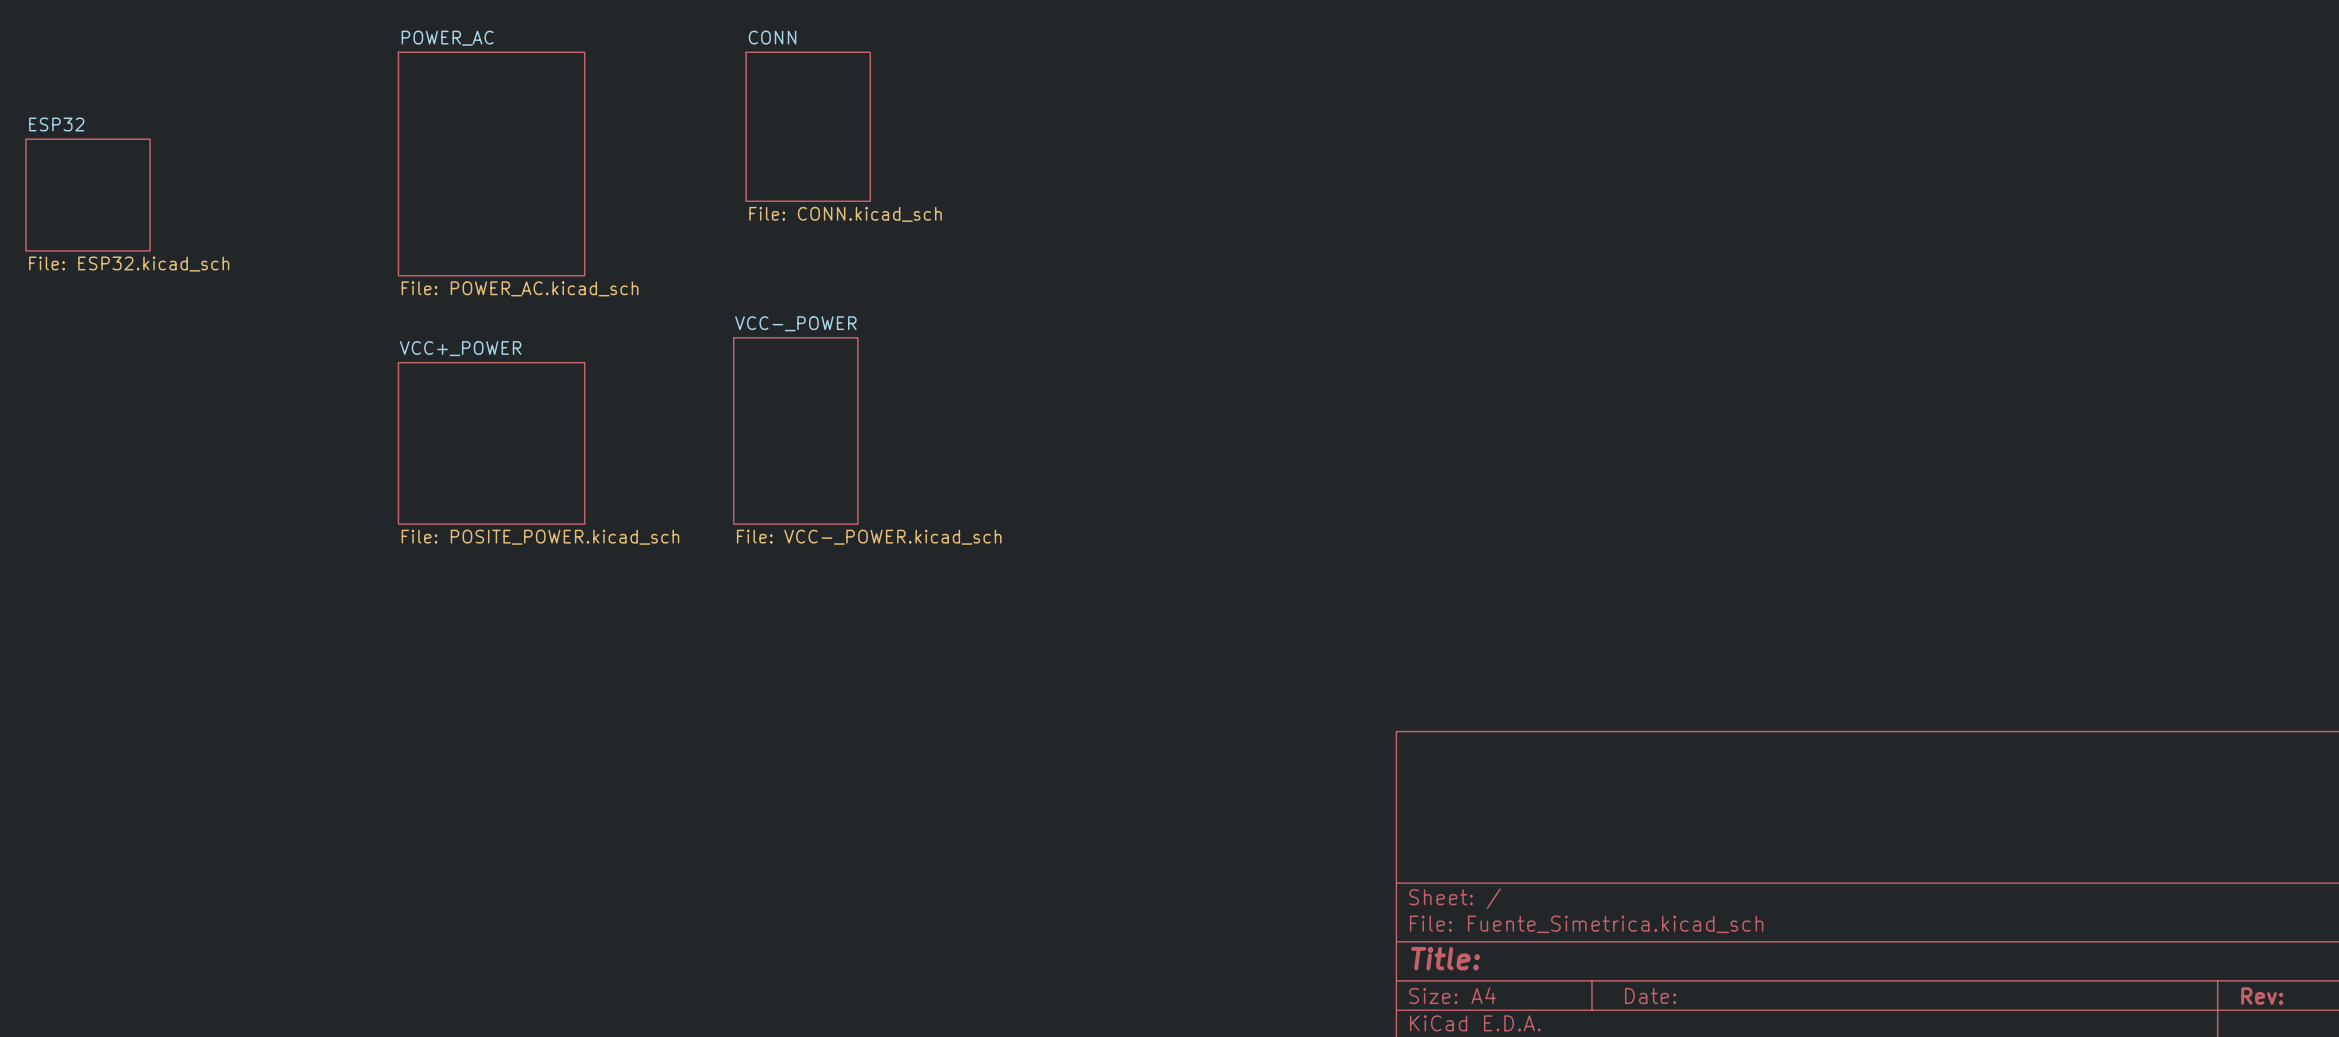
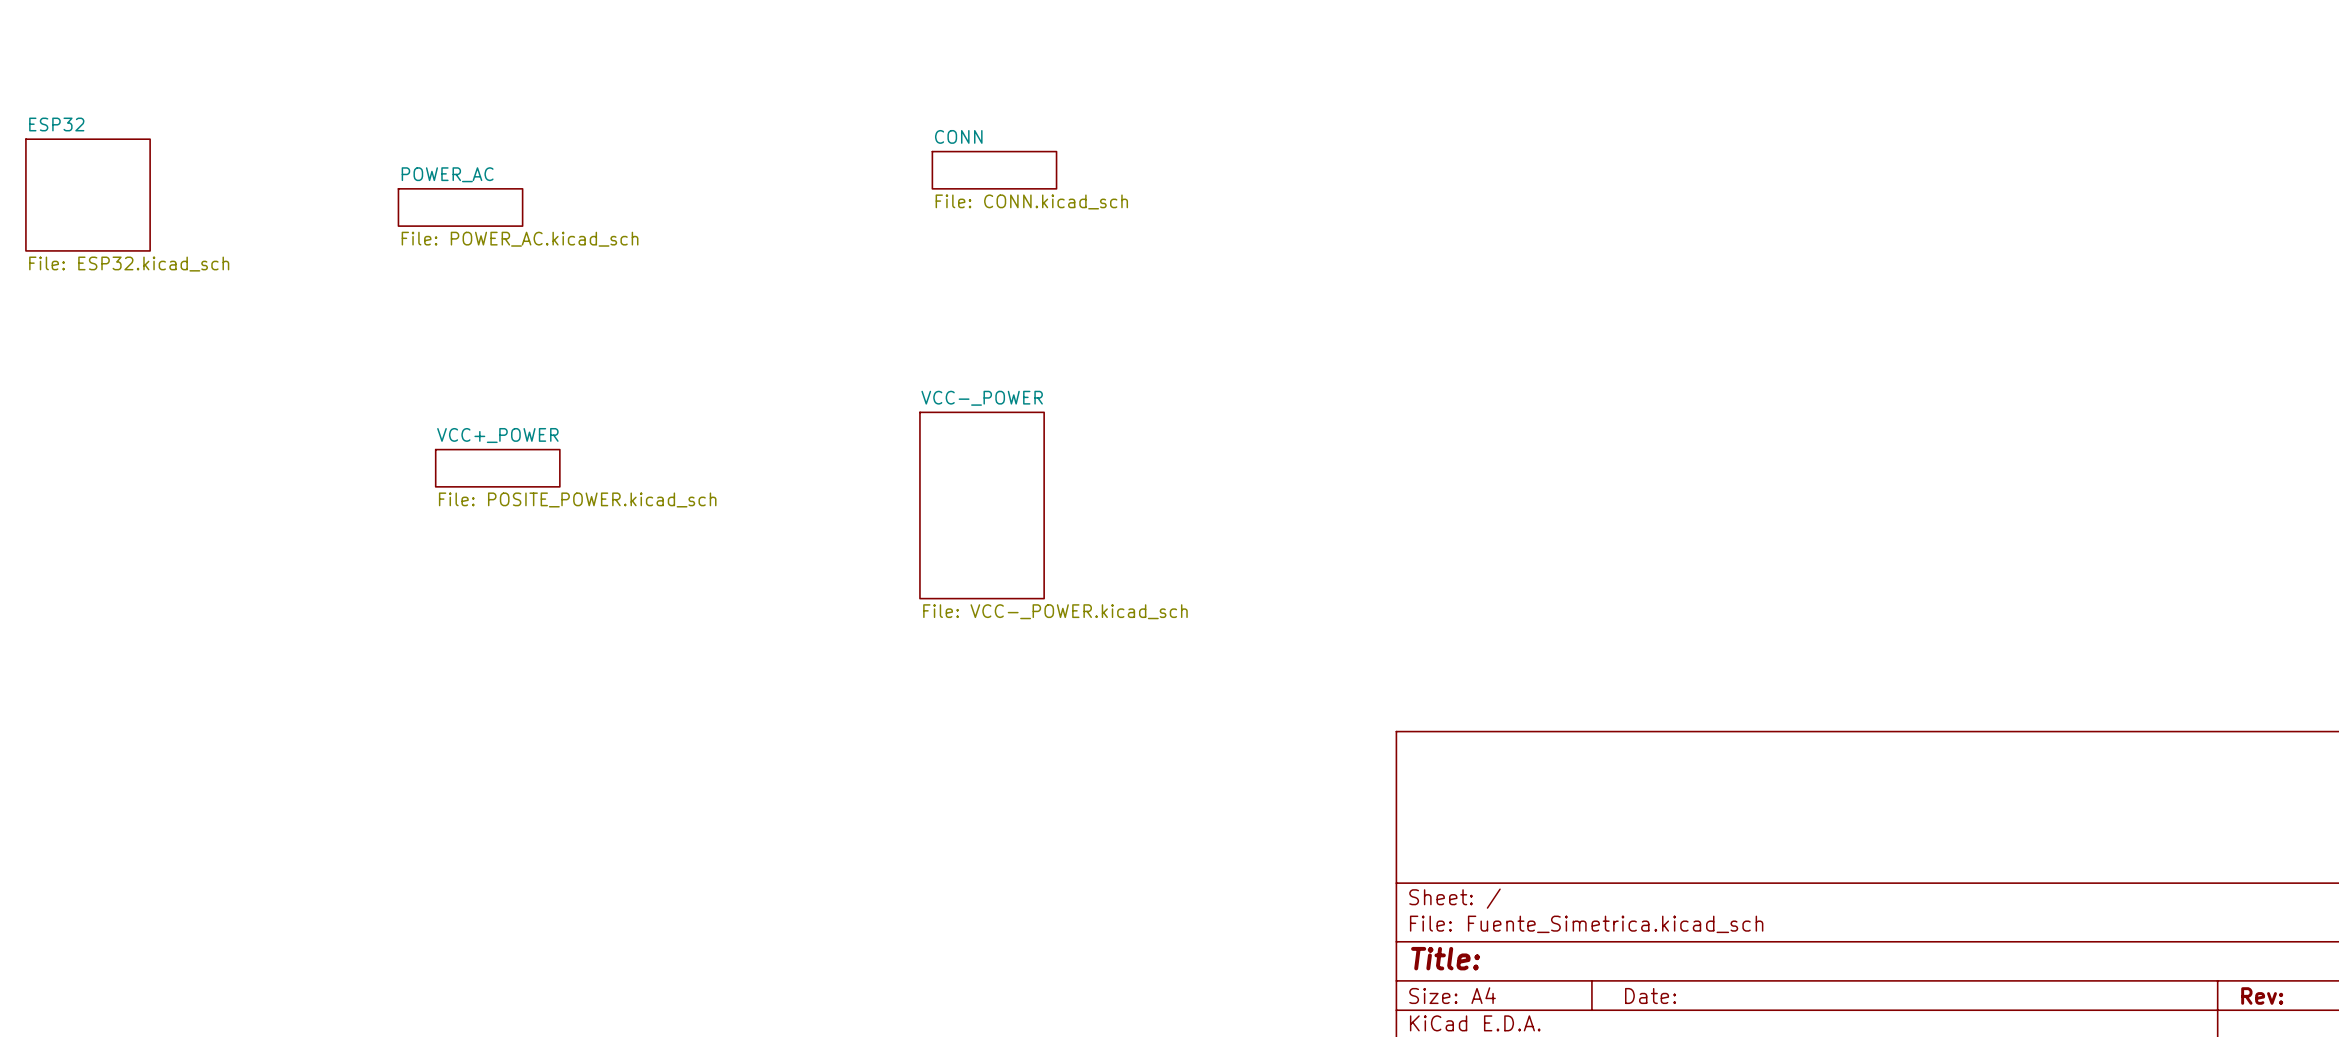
sheet CONN: File: CONN.kicad_sch (808, 126) -> none
sheet POWER_AC: File: POWER_AC.kicad_sch (491, 164) -> none
sheet CONN: none -> File: CONN.kicad_sch (994, 170)
sheet POWER_AC: none -> File: POWER_AC.kicad_sch (460, 207)
sheet VCC-_POWER position: (795, 430) -> (982, 505)
sheet VCC+_POWER: File: POSITE_POWER.kicad_sch (491, 443) -> none
sheet VCC+_POWER: none -> File: POSITE_POWER.kicad_sch (497, 468)

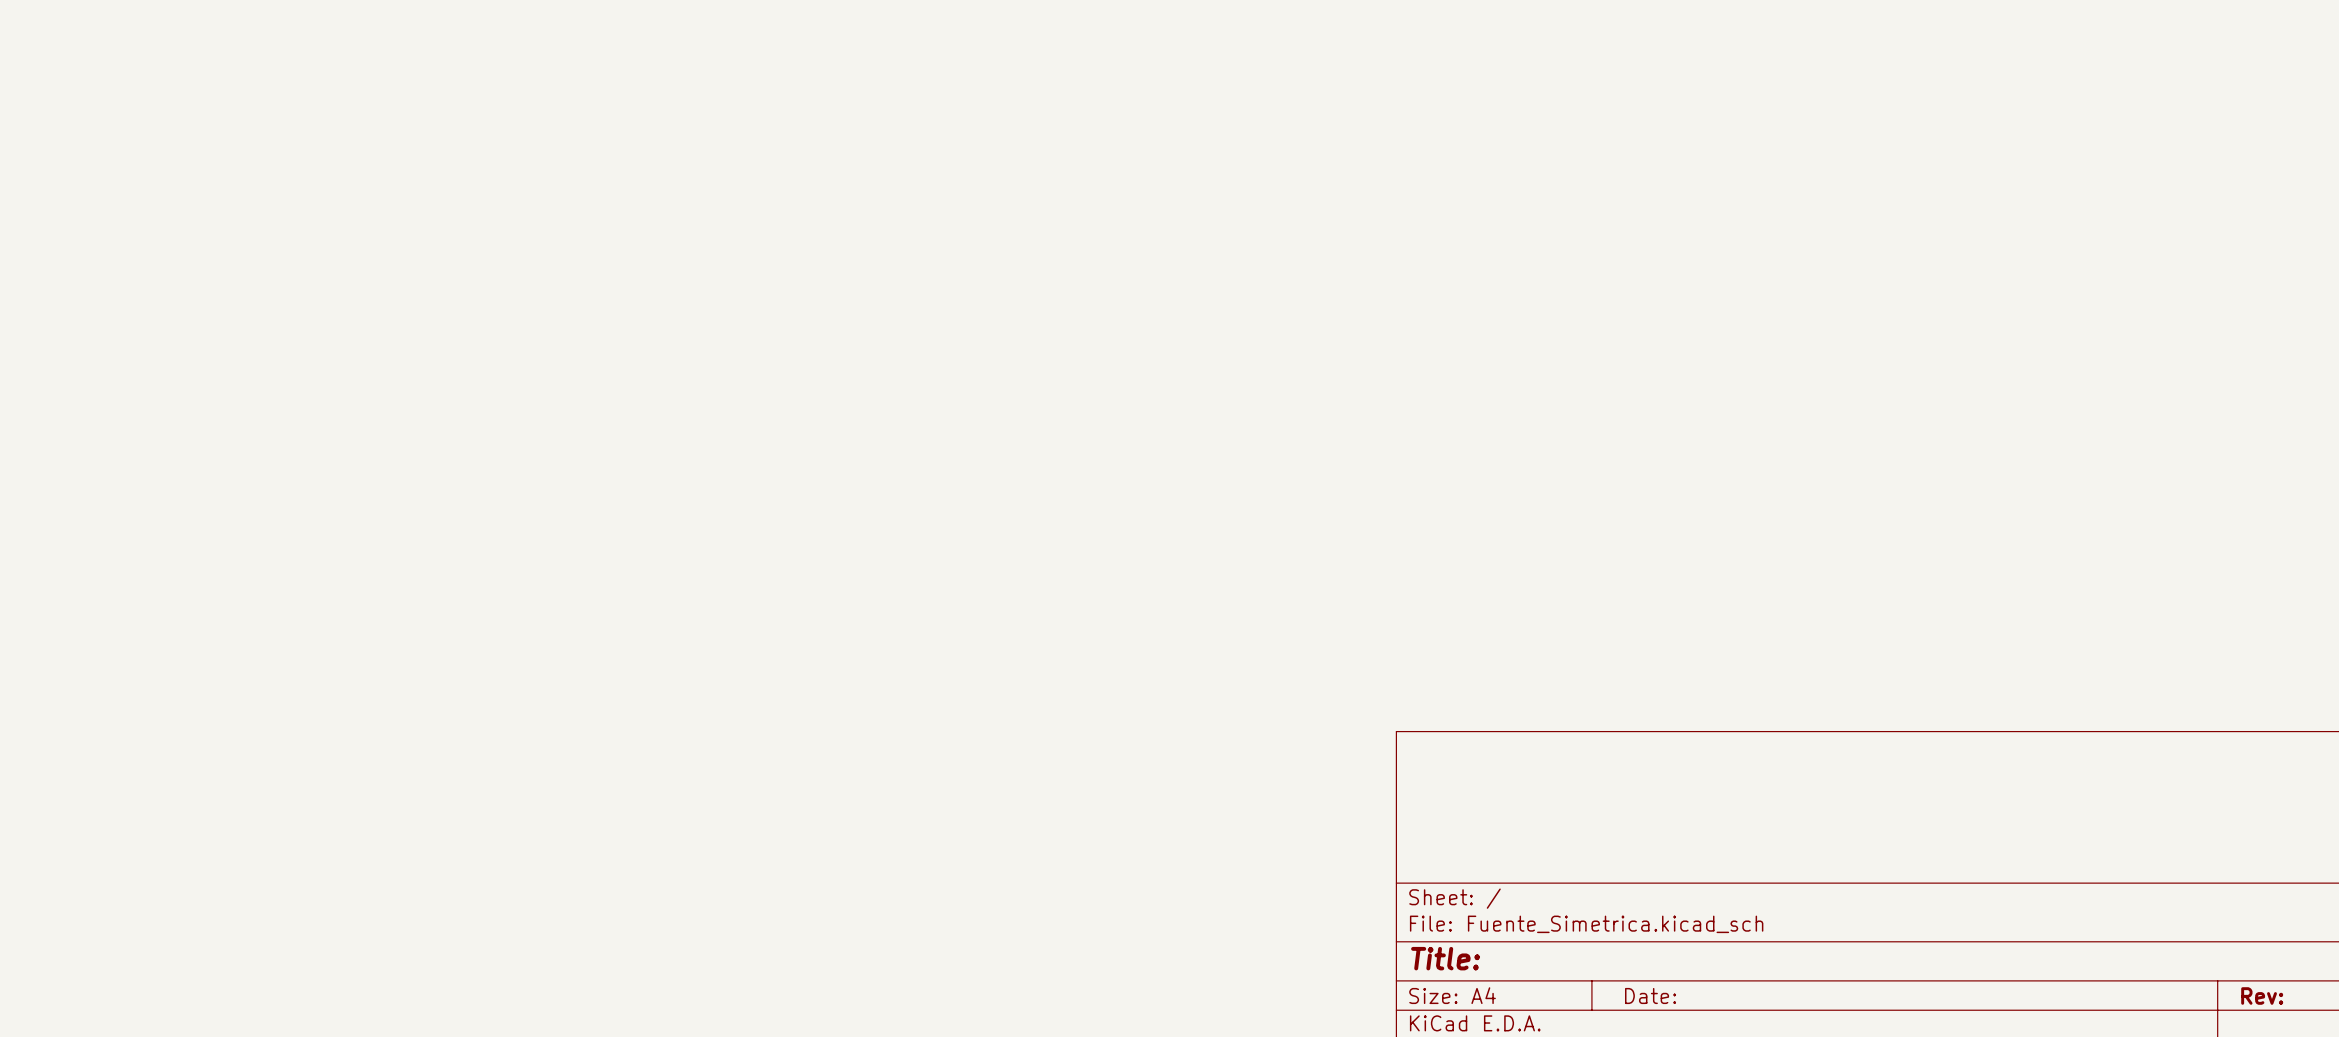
sheet CONN: File: CONN.kicad_sch (994, 170) -> none
sheet ESP32: File: ESP32.kicad_sch (88, 195) -> none
sheet POWER_AC: File: POWER_AC.kicad_sch (460, 207) -> none
sheet VCC+_POWER: File: POSITE_POWER.kicad_sch (497, 468) -> none
sheet VCC-_POWER: File: VCC-_POWER.kicad_sch (982, 505) -> none

